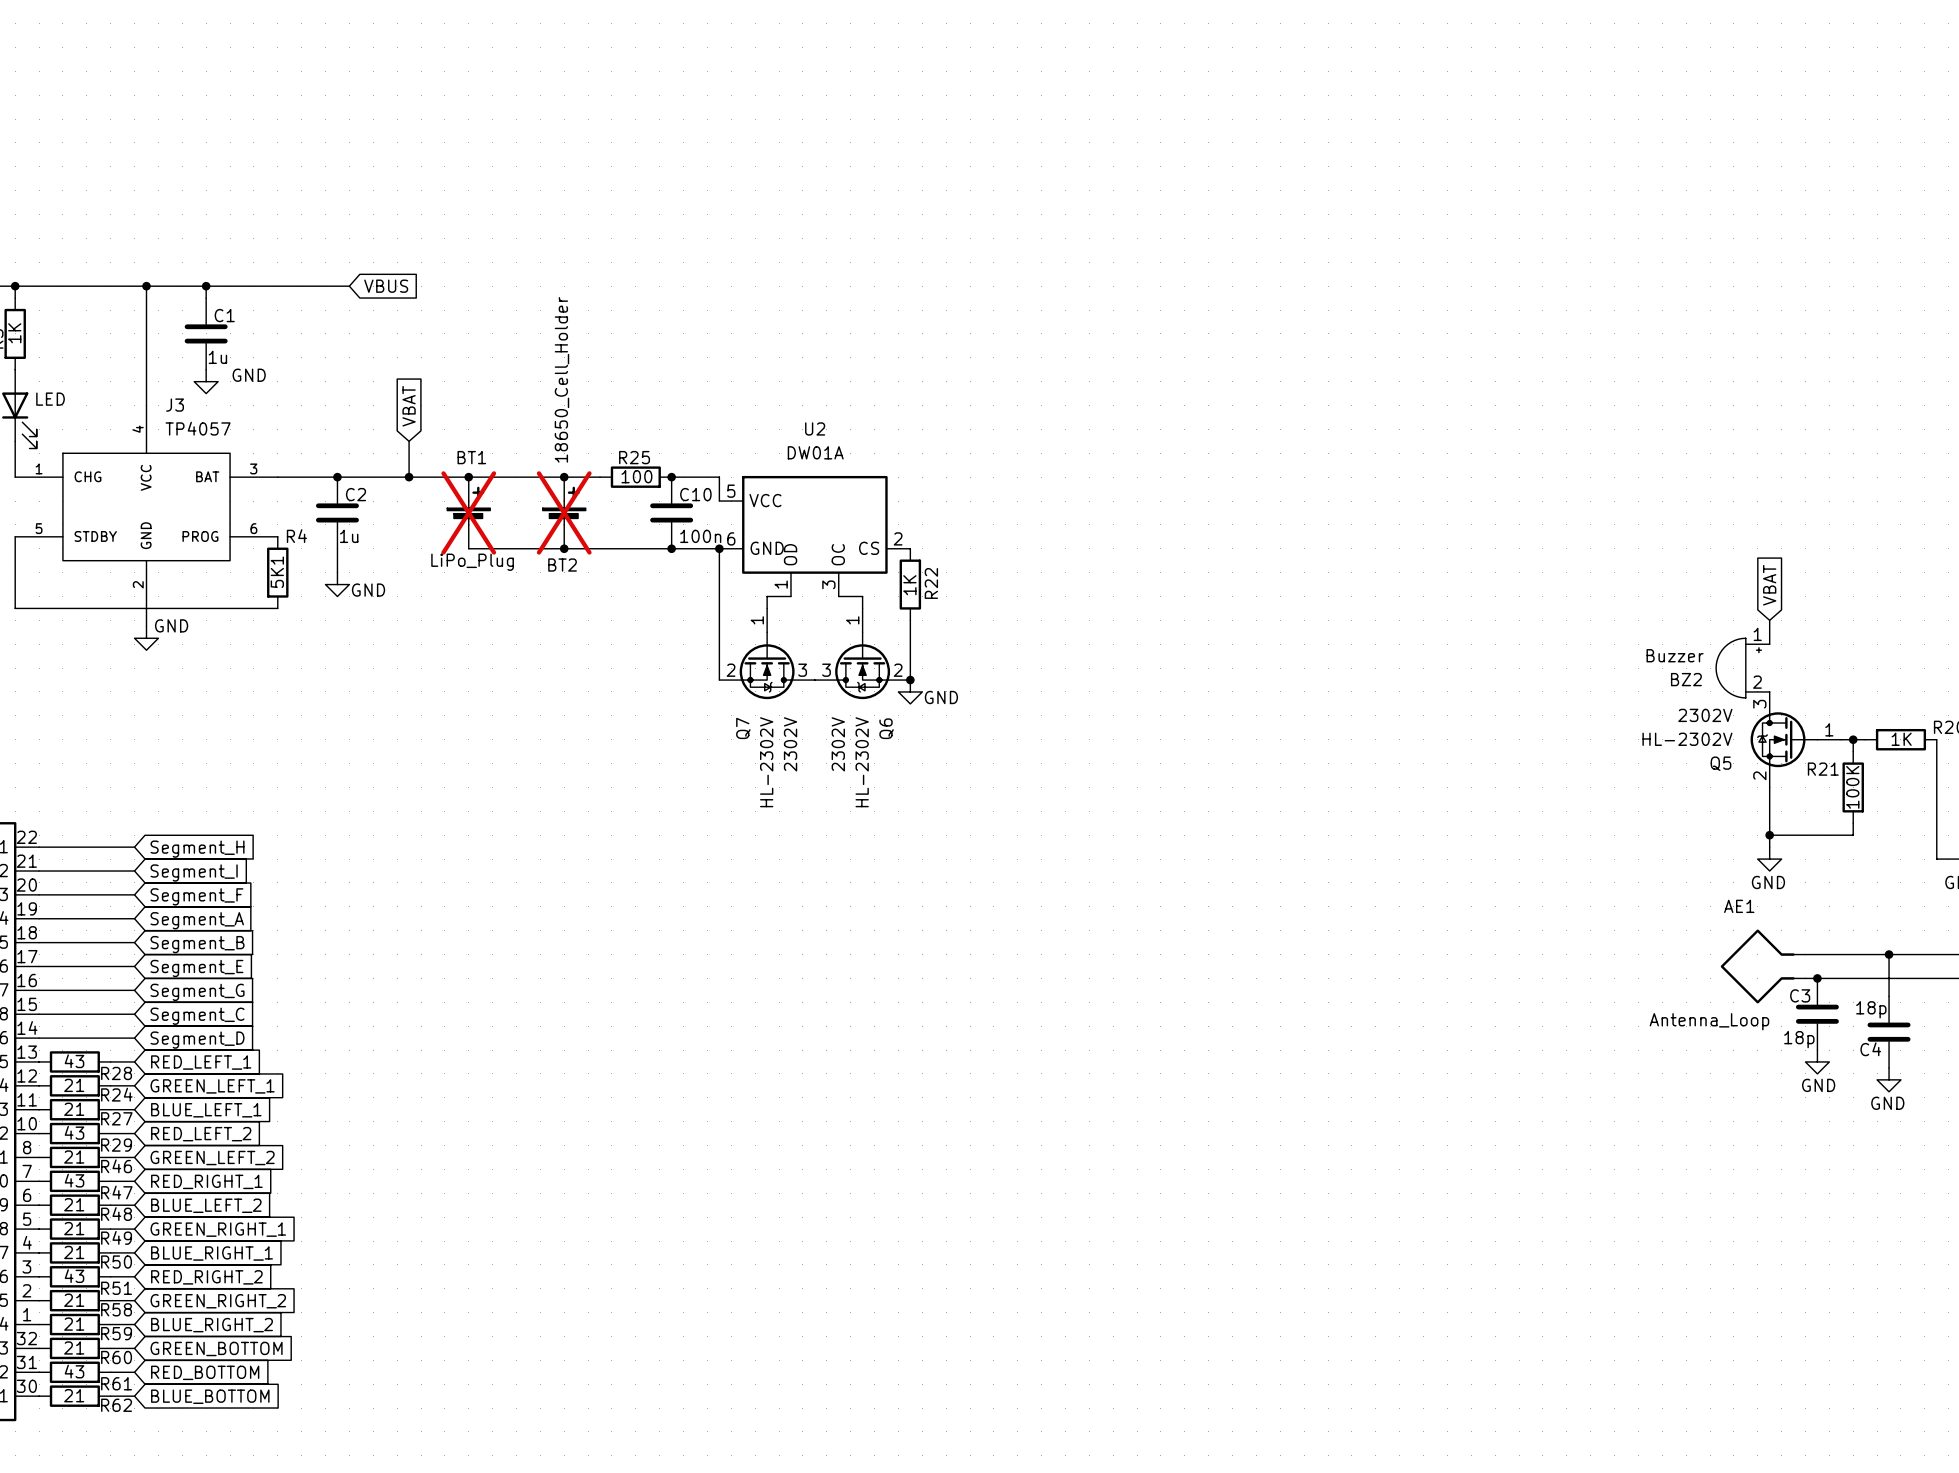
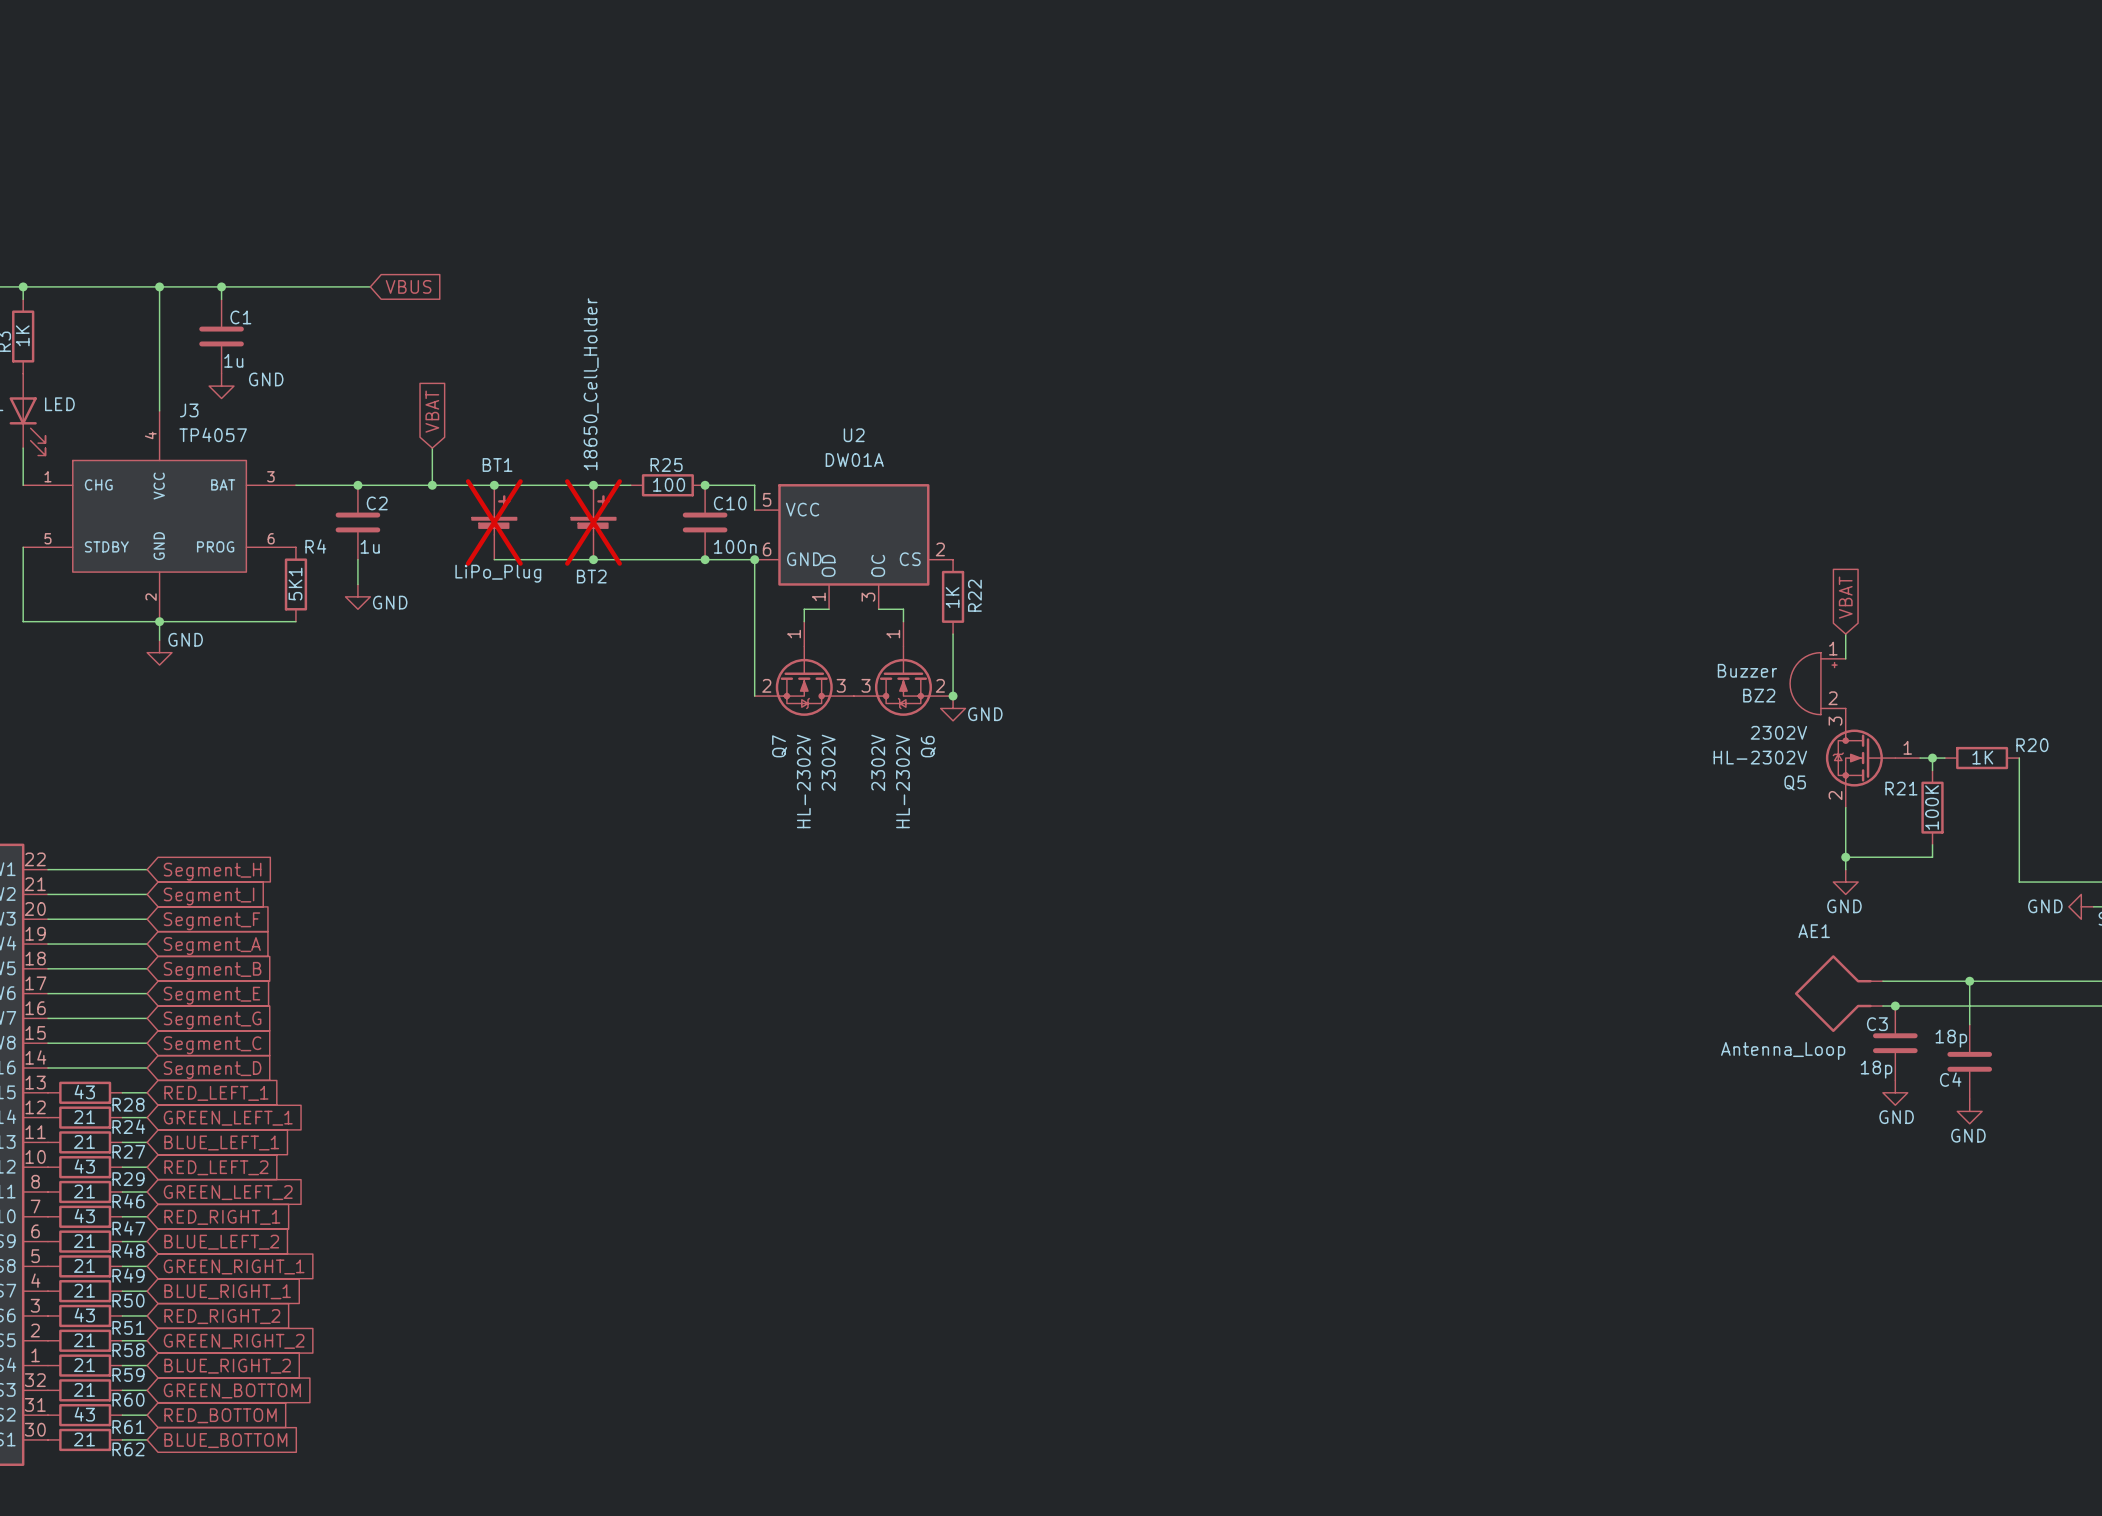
junction: none -> (159, 621)

